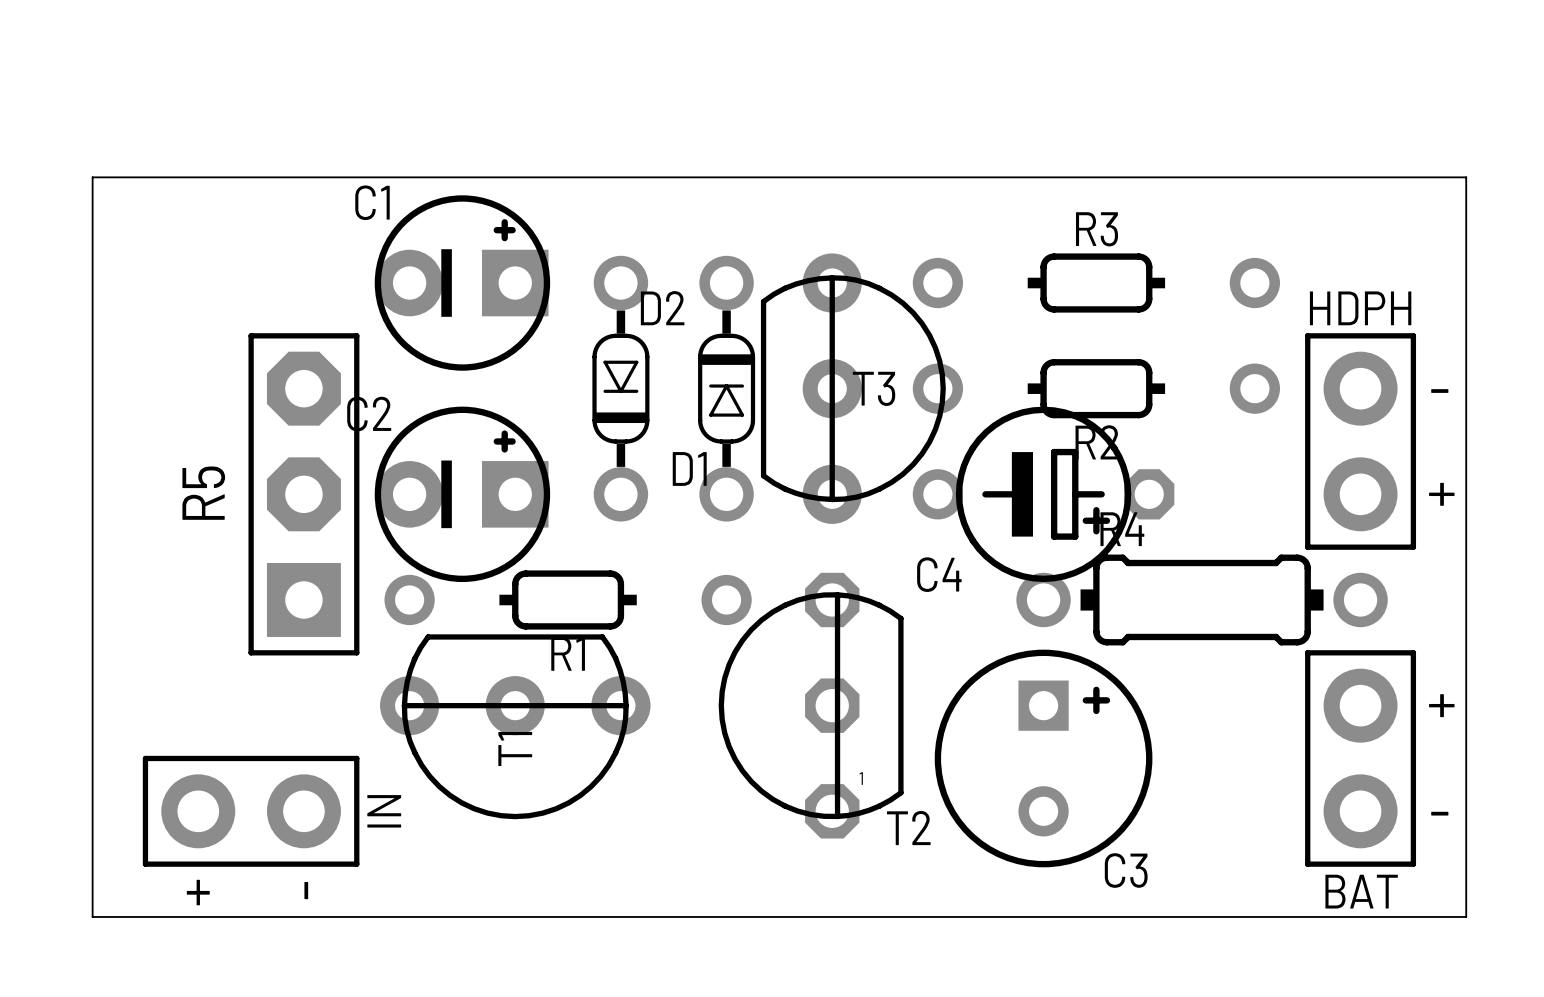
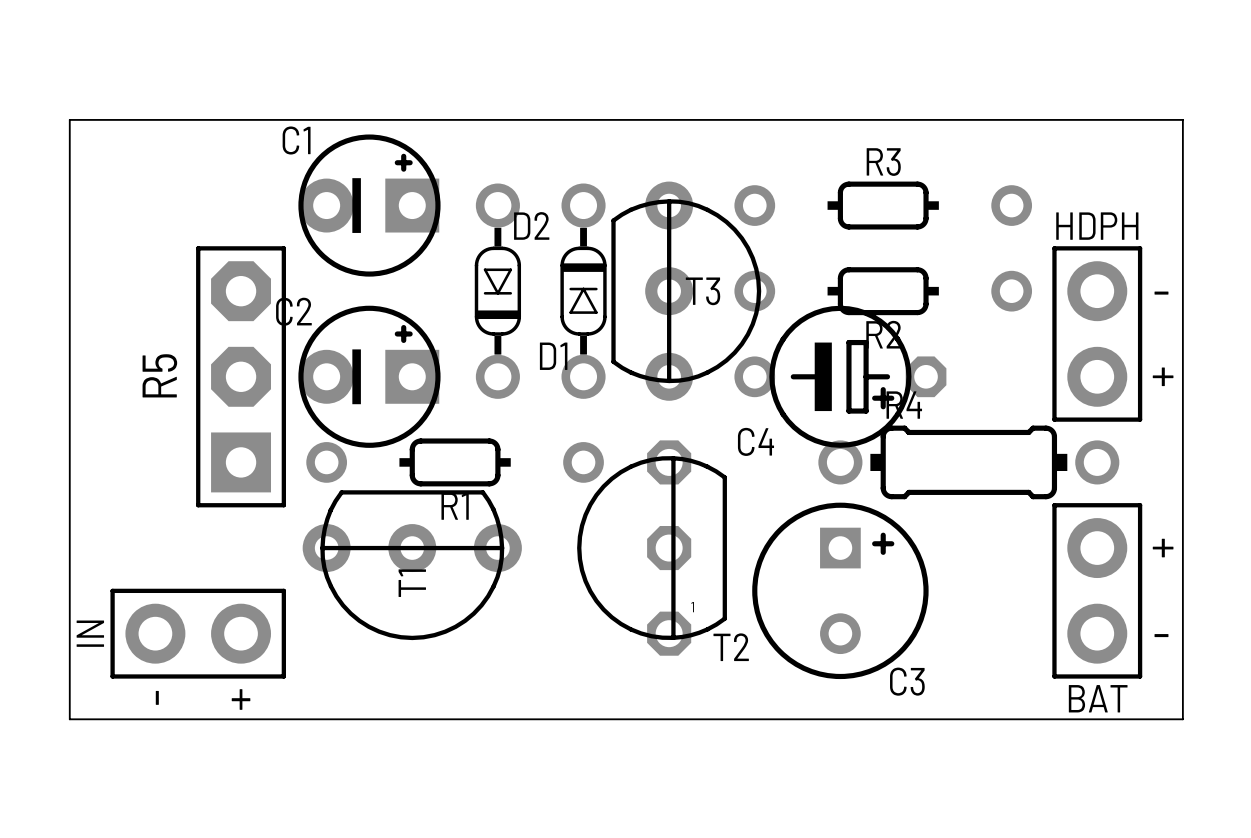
IN name position: IN (384, 811) -> IN (90, 633)
IN text position: - (306, 890) -> - (157, 697)
IN text position: + (198, 892) -> + (241, 699)

